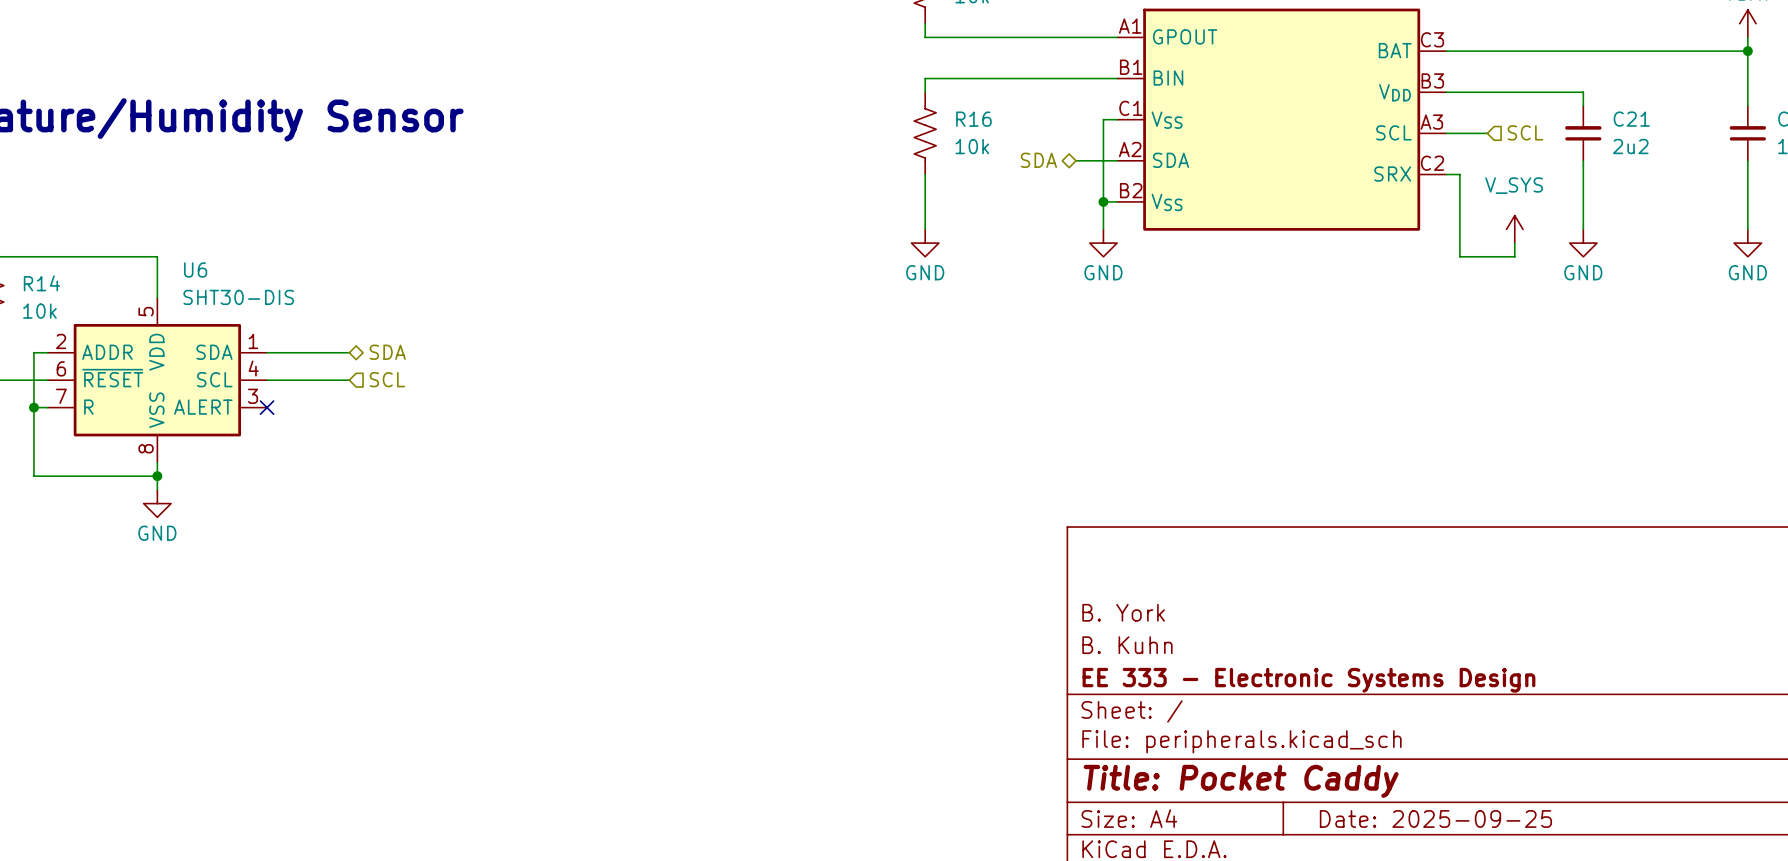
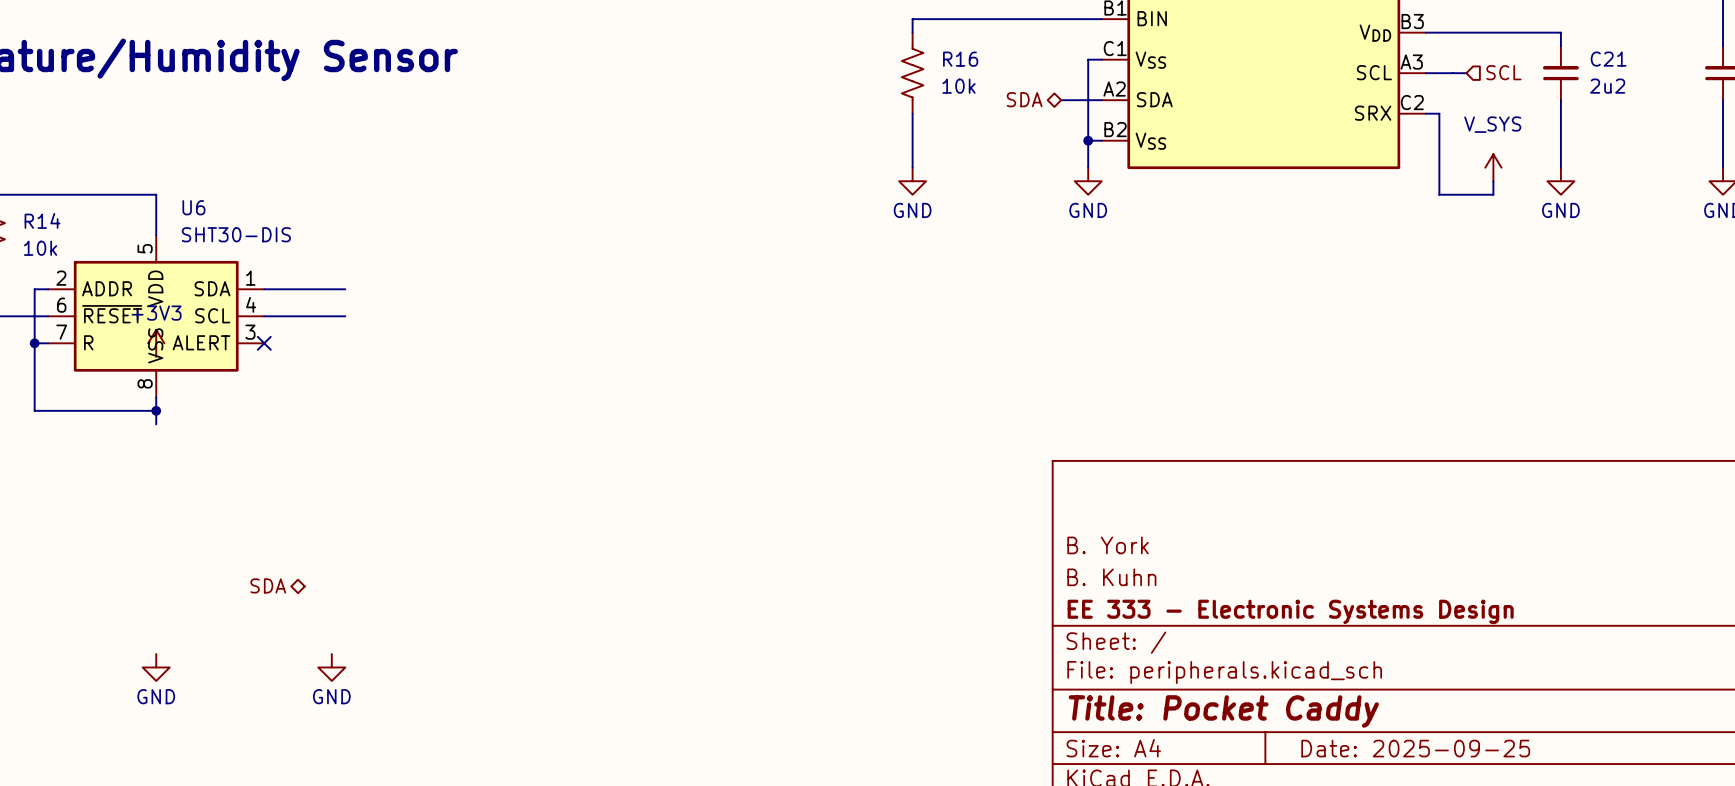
hierarchical label: SDA (387, 352) -> none
hierarchical label: SCL (387, 379) -> none
power symbol: none -> +3V3 (156, 343)
power symbol: GND (157, 503) -> none
hierarchical label: none -> SDA (268, 585)
power symbol: none -> GND (156, 667)
power symbol: none -> GND (331, 667)

